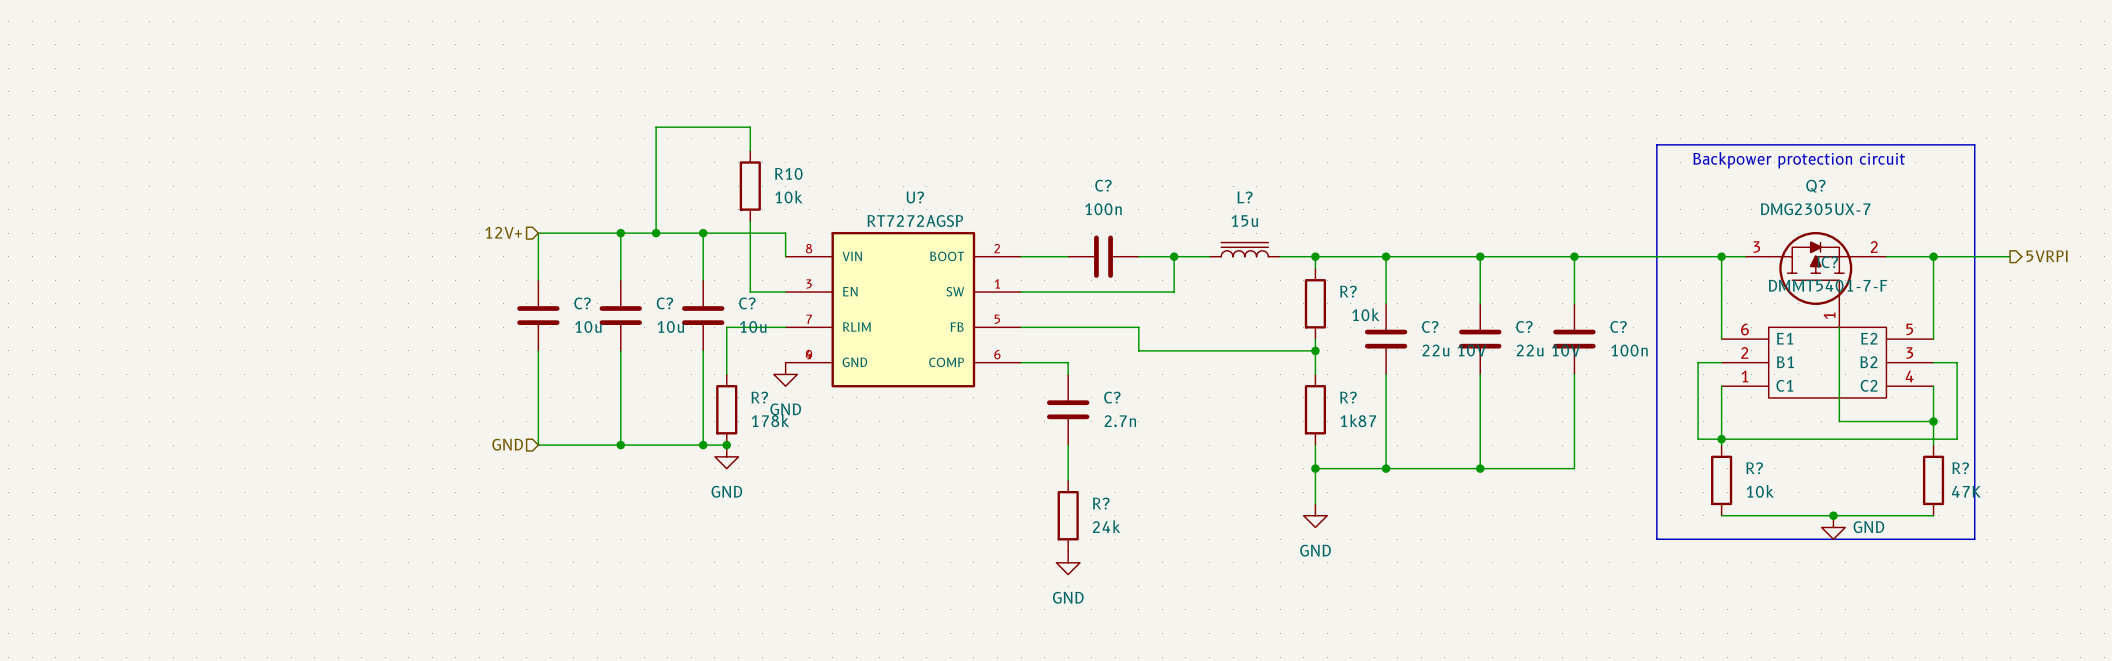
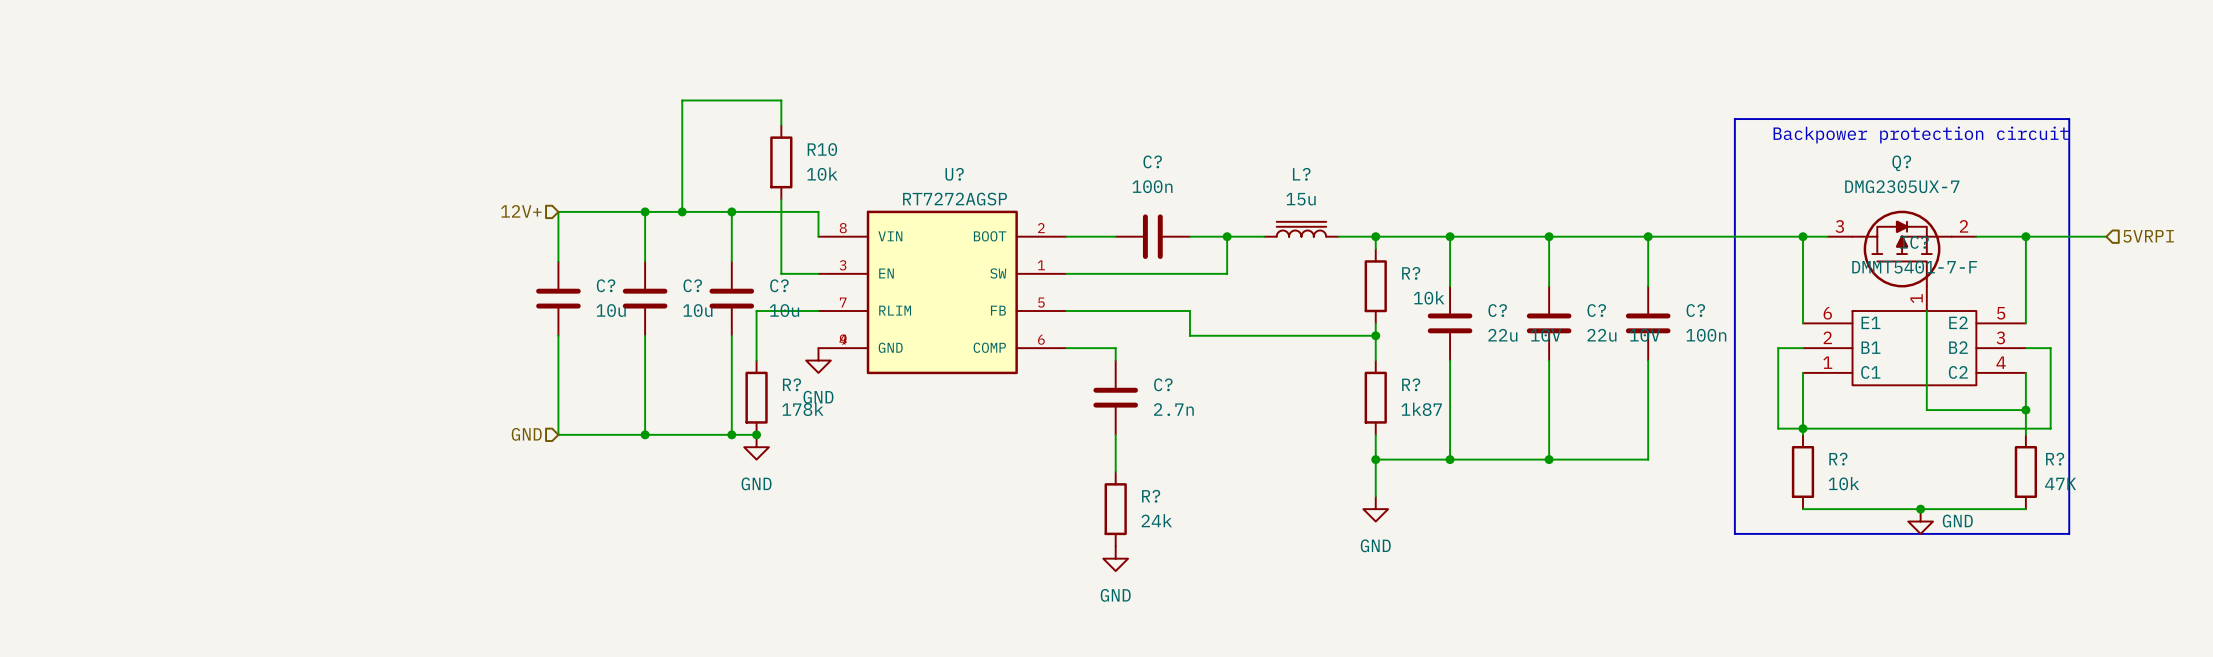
hierarchical label shape: output (2047, 256) -> input (2148, 236)

